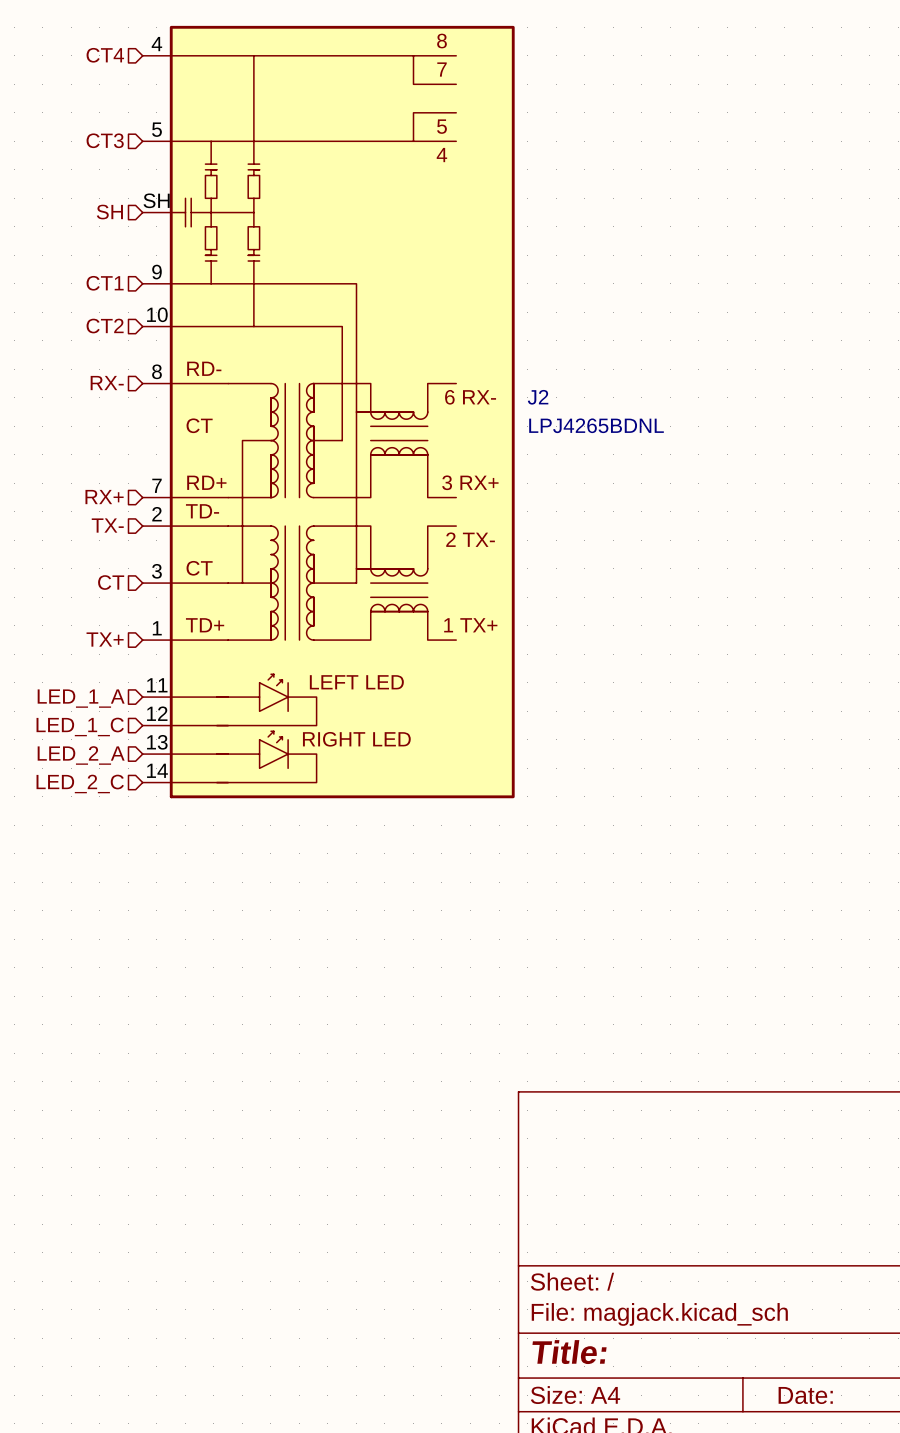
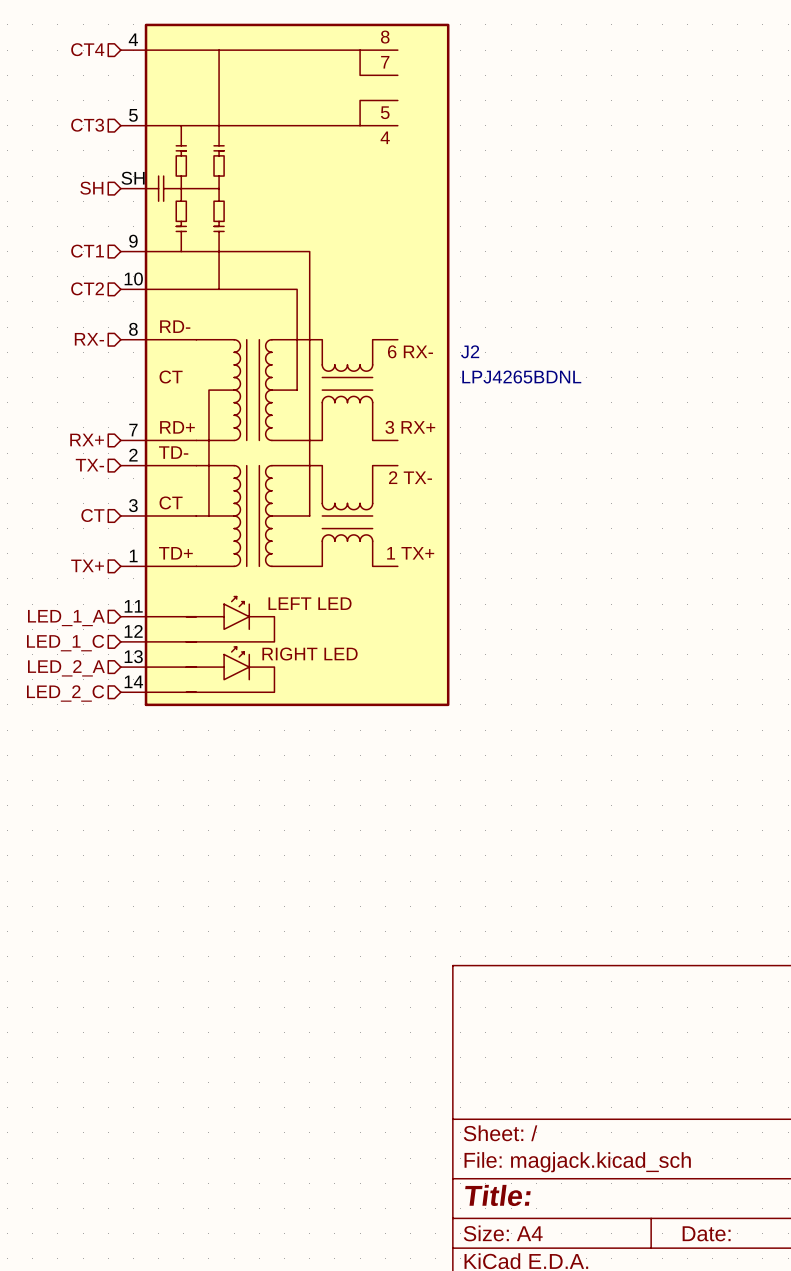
J2 symbol: [142, 25, 515, 799] -> [120, 23, 450, 707]

